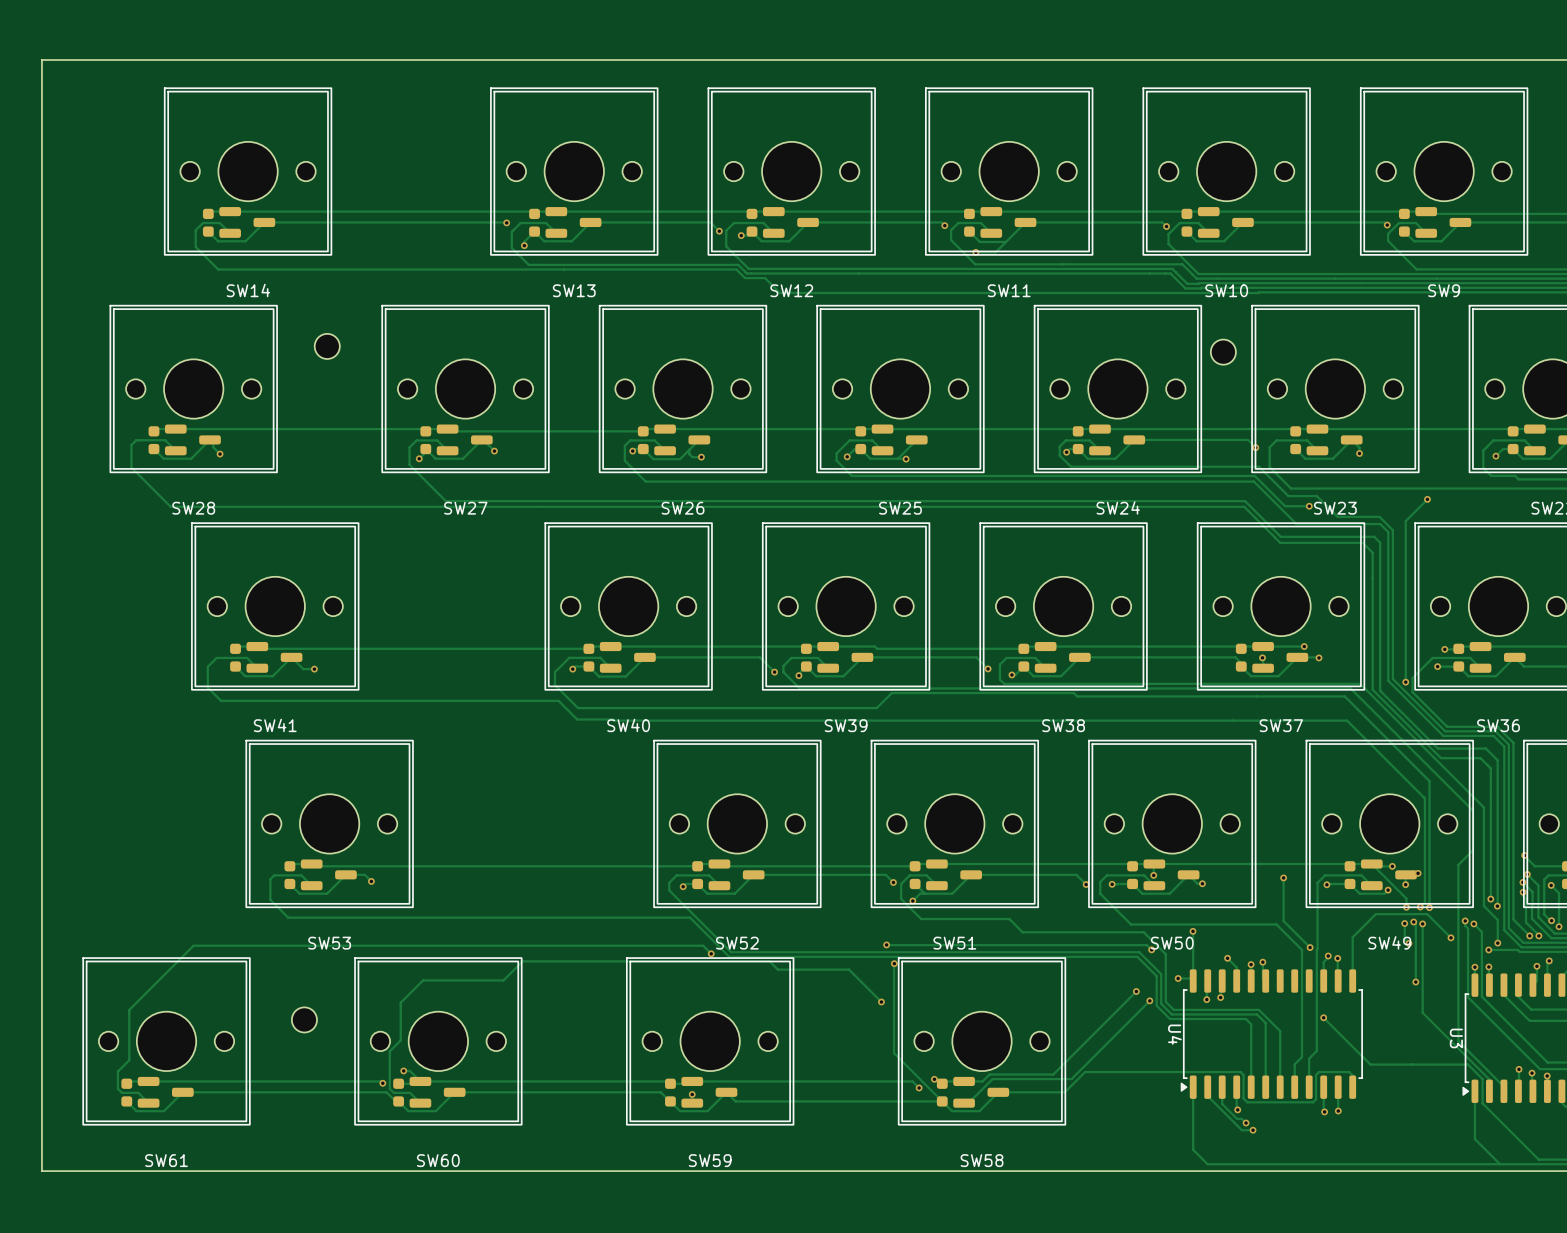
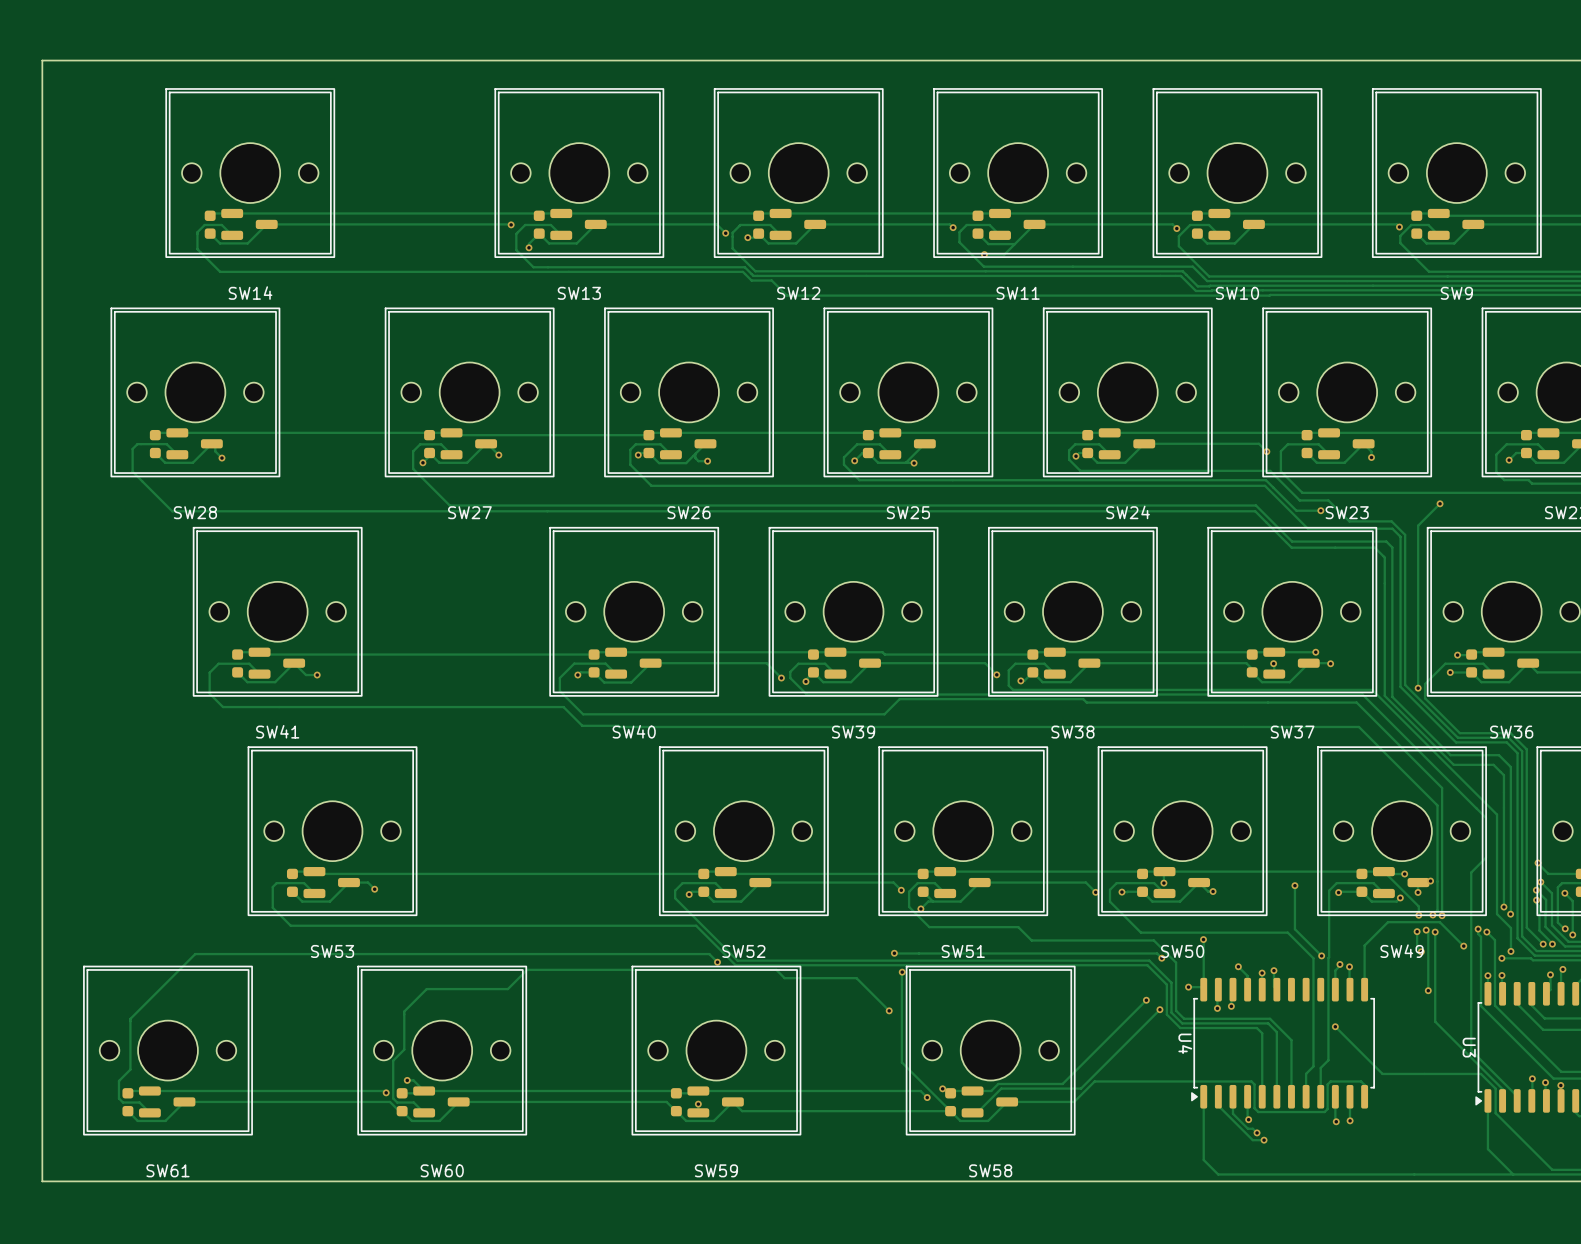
part: (327, 346) -> none
part: (1223, 352) -> none
part: (304, 1019) -> none

